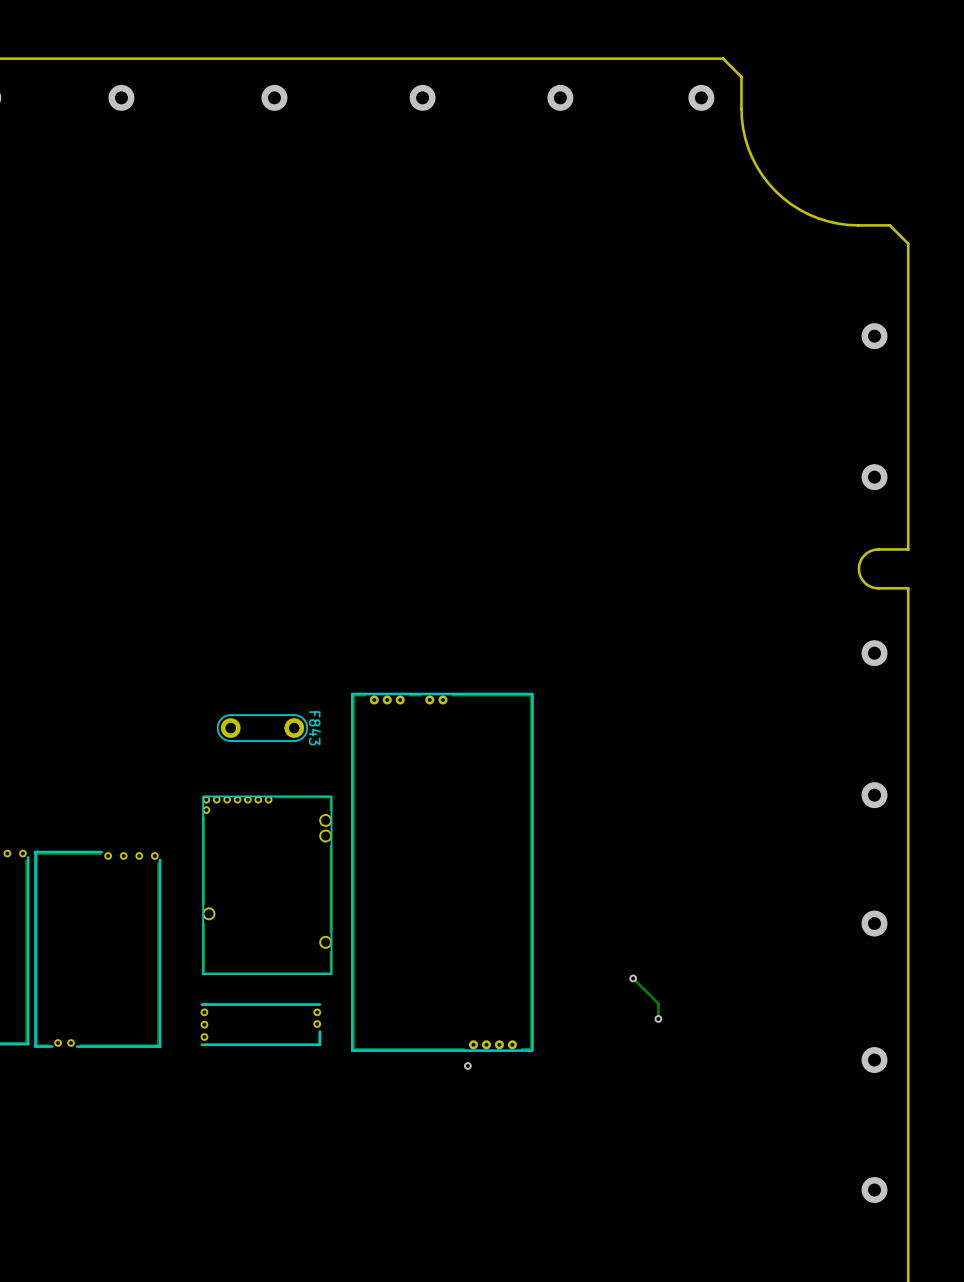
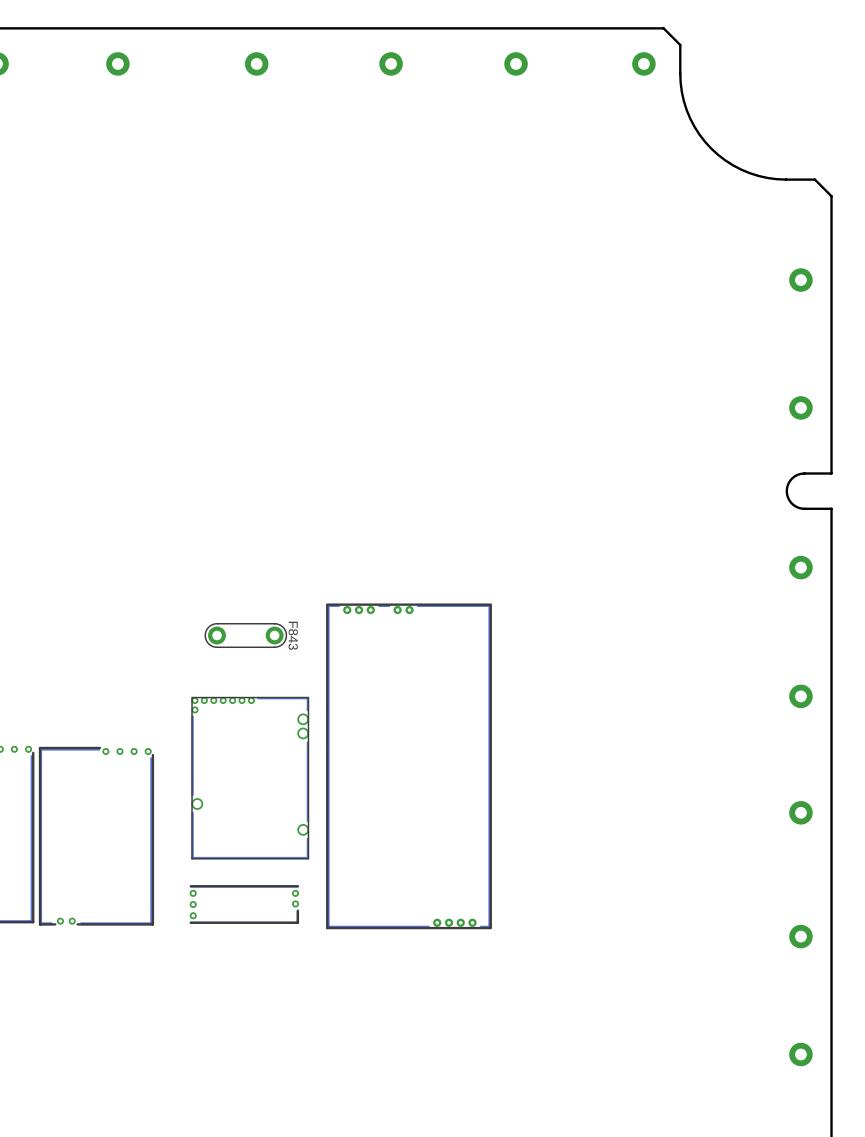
track: (633, 978) (658, 1003) (658, 1018) -> none
via: (633, 978) -> none
via: (658, 1018) -> none
via: (467, 1065) -> none

